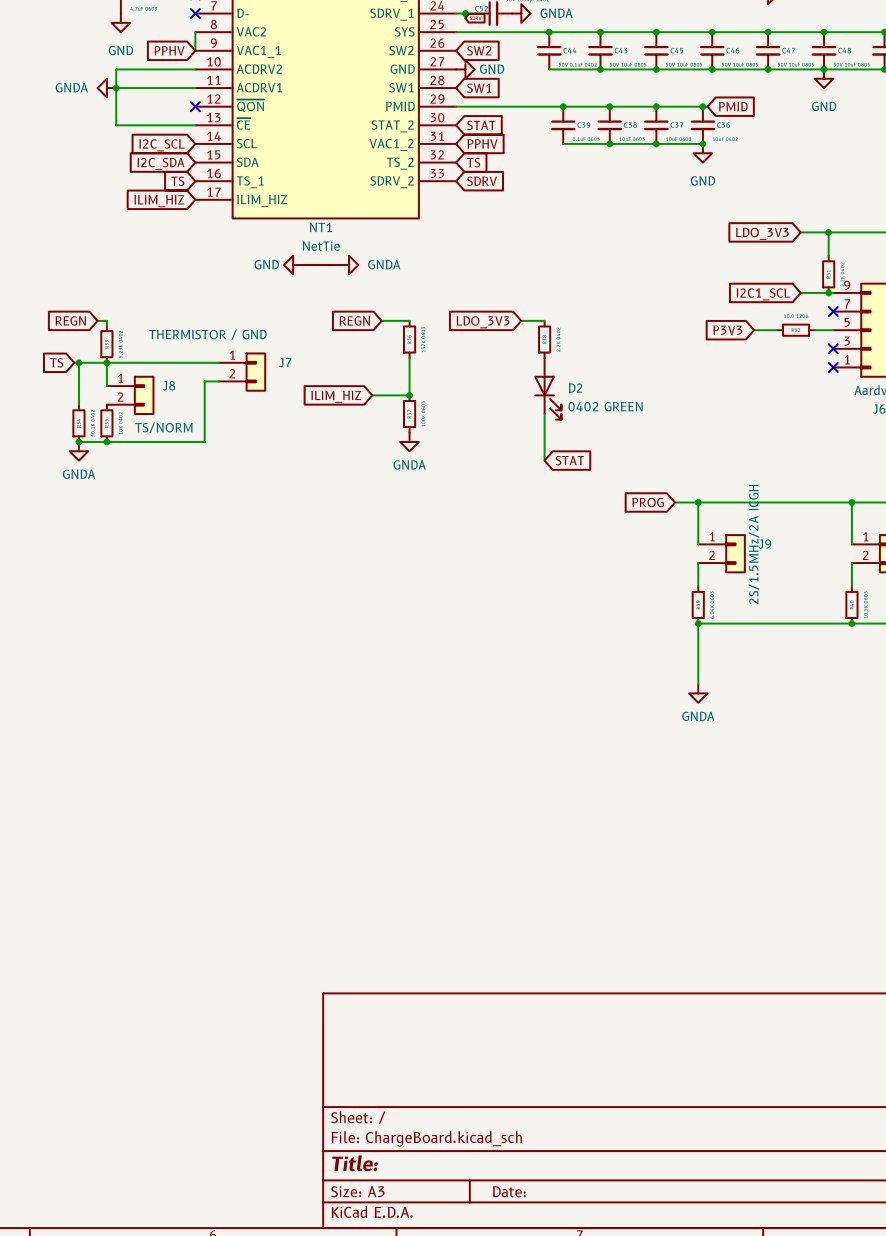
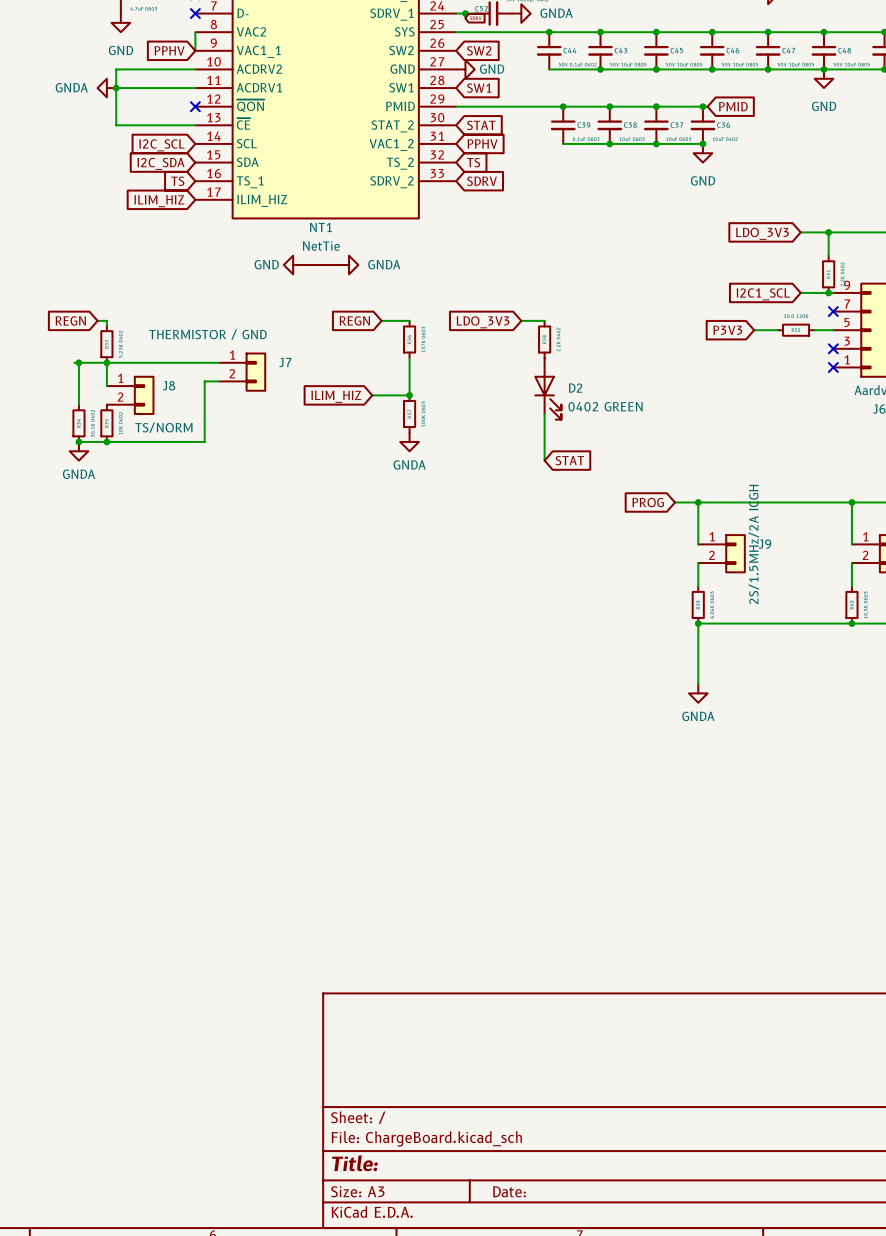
global label: TS (56, 362) -> none

